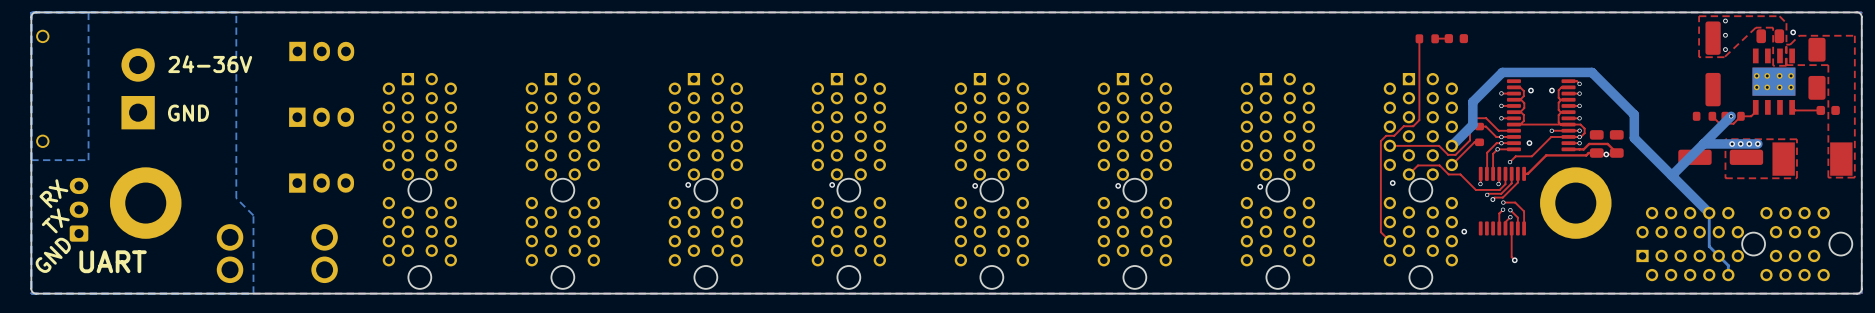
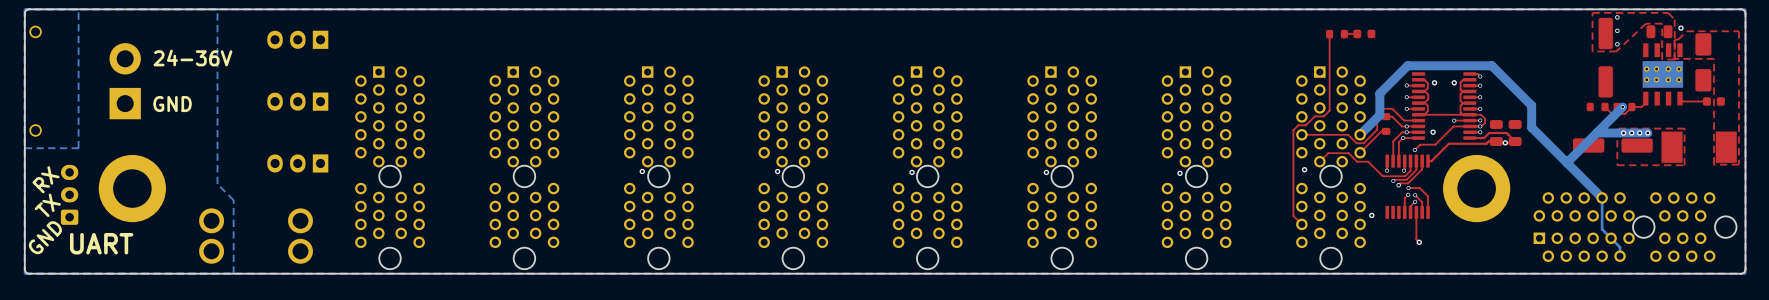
part rotation: 0° (321, 51) -> 180° (297, 39)
part rotation: 0° (321, 117) -> 180° (297, 101)
part rotation: 0° (321, 183) -> 180° (297, 163)

